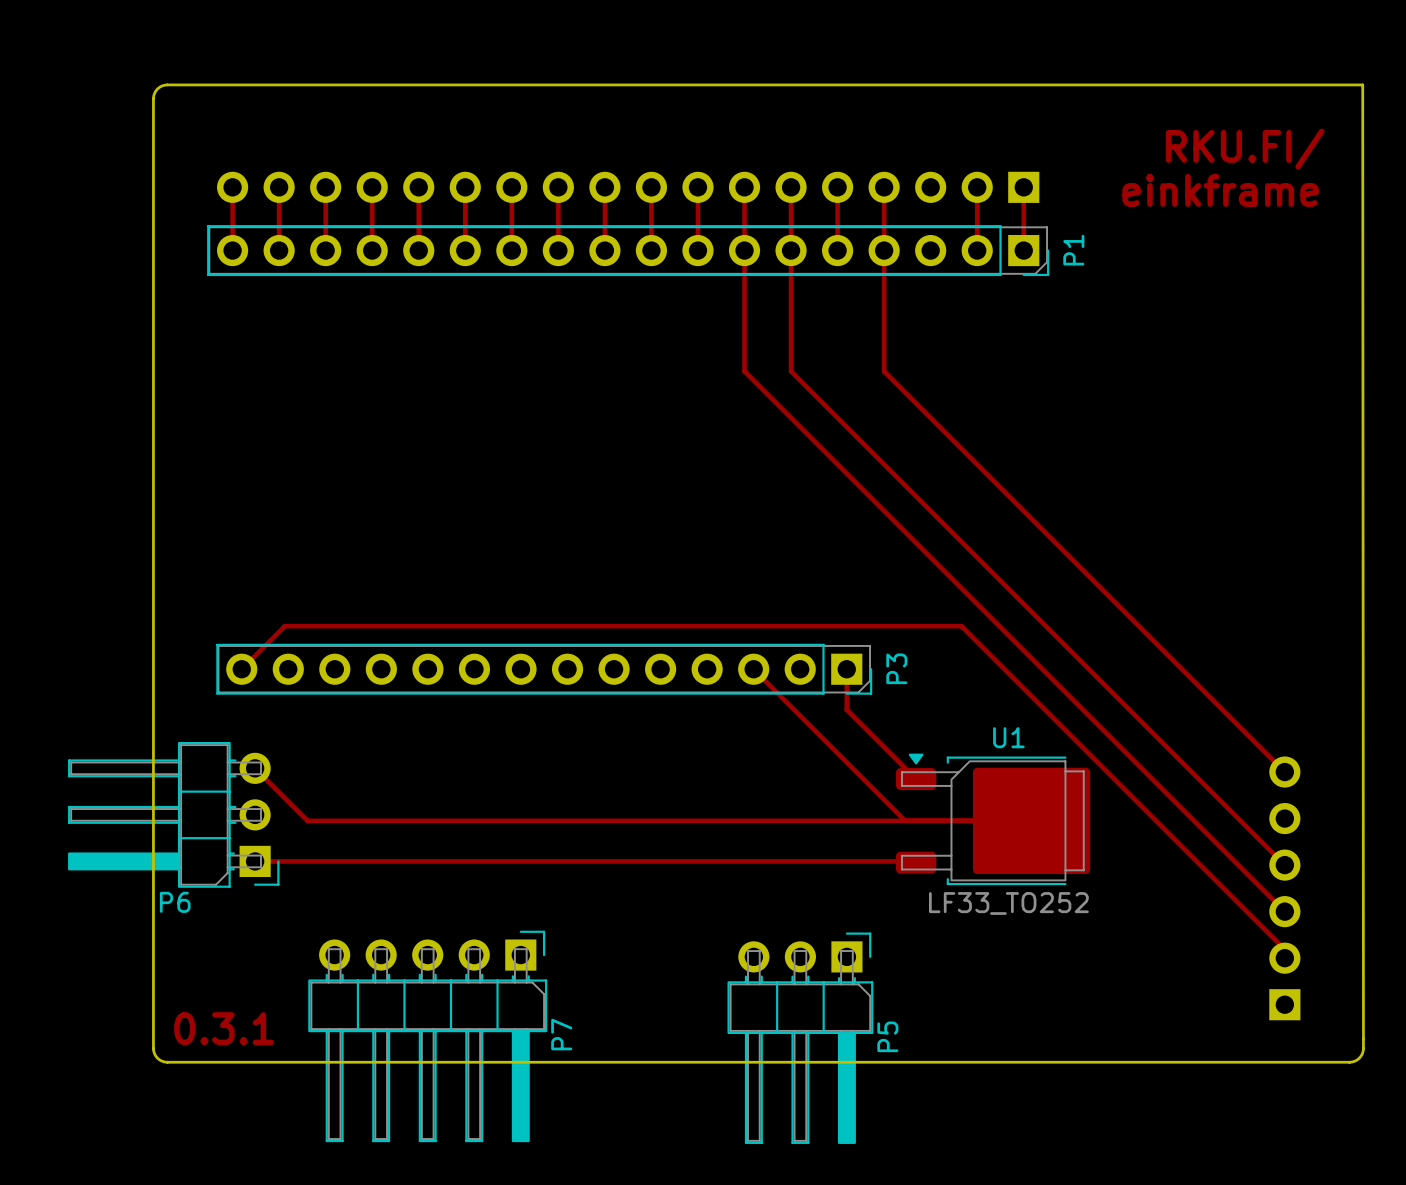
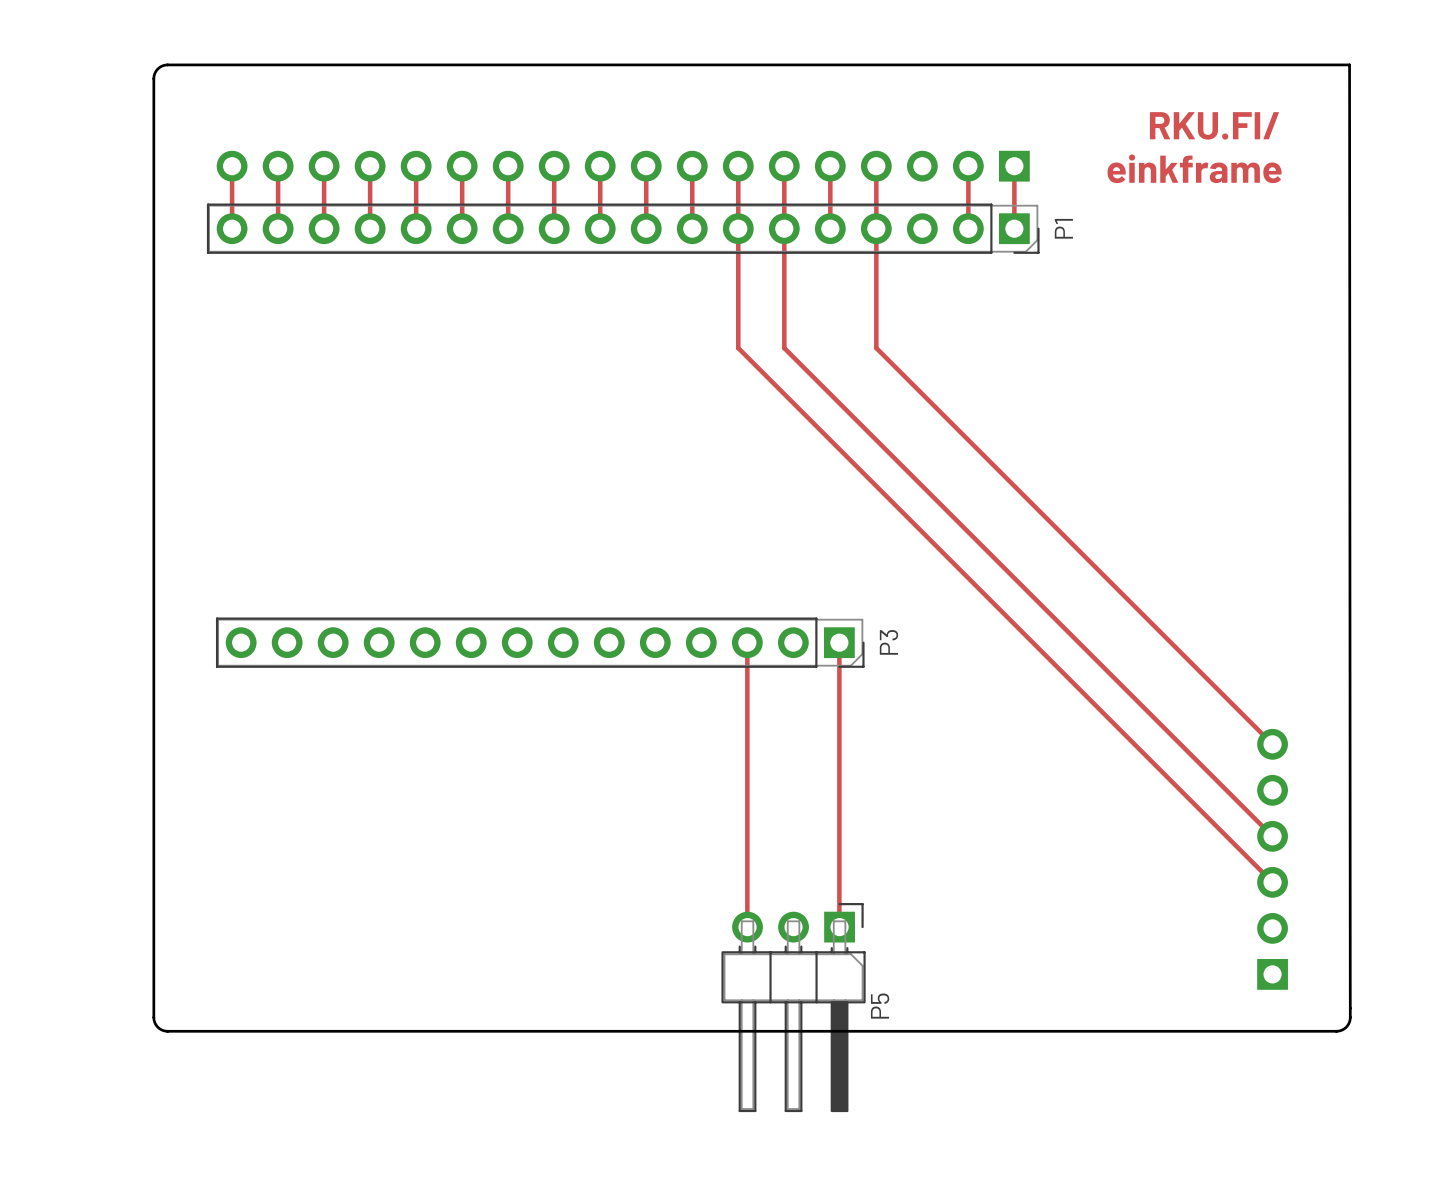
track: (241, 669) (284, 626) (961, 626) (1284, 949) (1284, 958) -> none
track: (753, 669) (905, 820) -> (747, 642) (747, 926)
track: (846, 709) (916, 779) -> (839, 682) (839, 926)
track: (255, 768) (307, 820) (1031, 820) -> none
P6: (173, 814) -> none
U1: LF33_TO252 (993, 819) -> none
track: (255, 861) (916, 862) -> none
text: 0.3.1 (224, 1028) -> none
P7: (427, 1036) -> none

